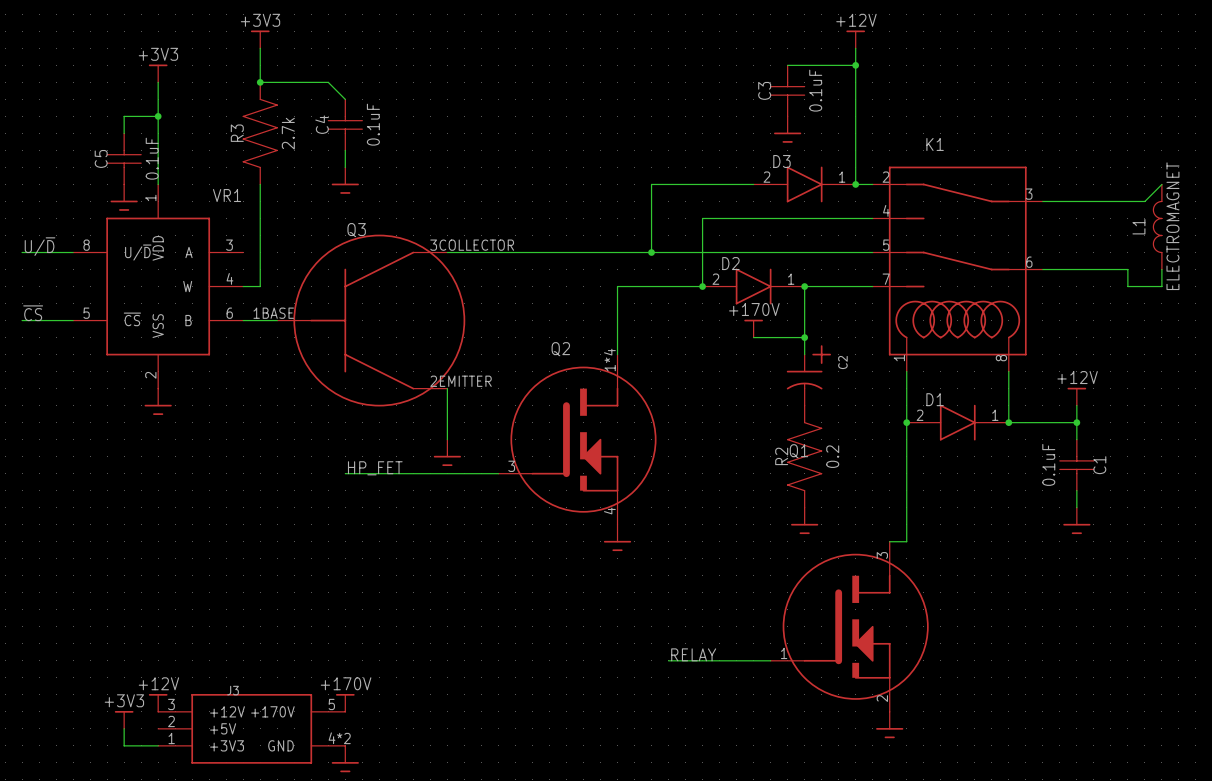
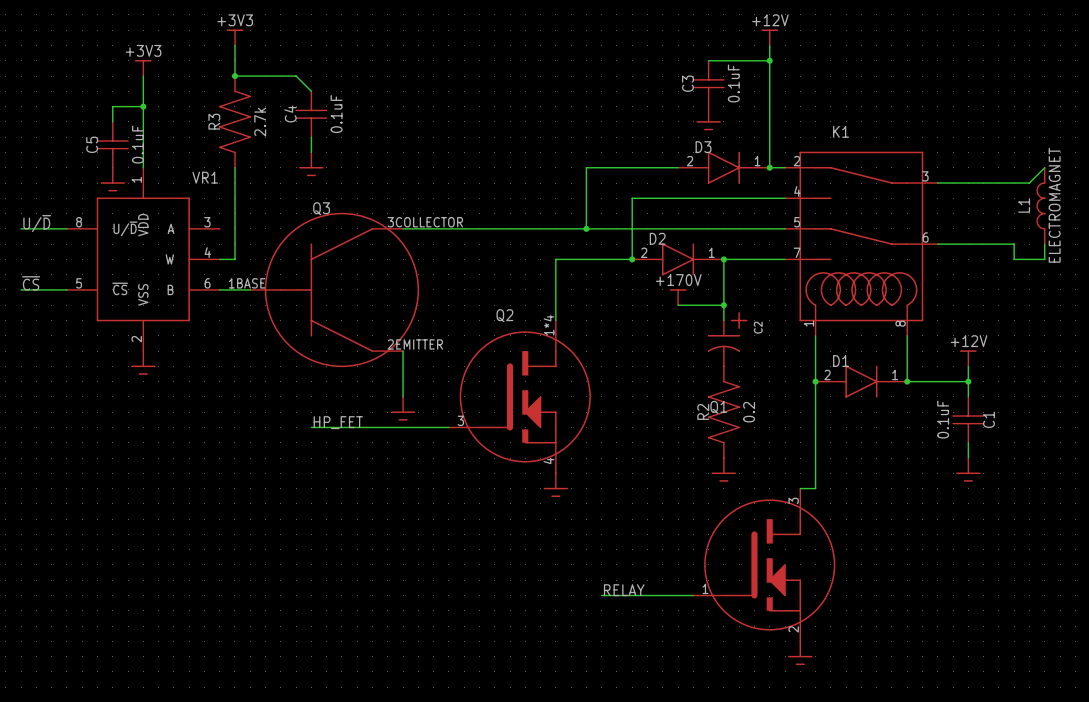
power symbol: +12V (158, 702) -> none
power symbol: +170V (345, 702) -> none
power symbol: +3V3 (124, 719) -> none
wire: (124, 728) (124, 745) (158, 745) -> none
J3: (251, 728) -> none
power symbol: (345, 759) -> none

